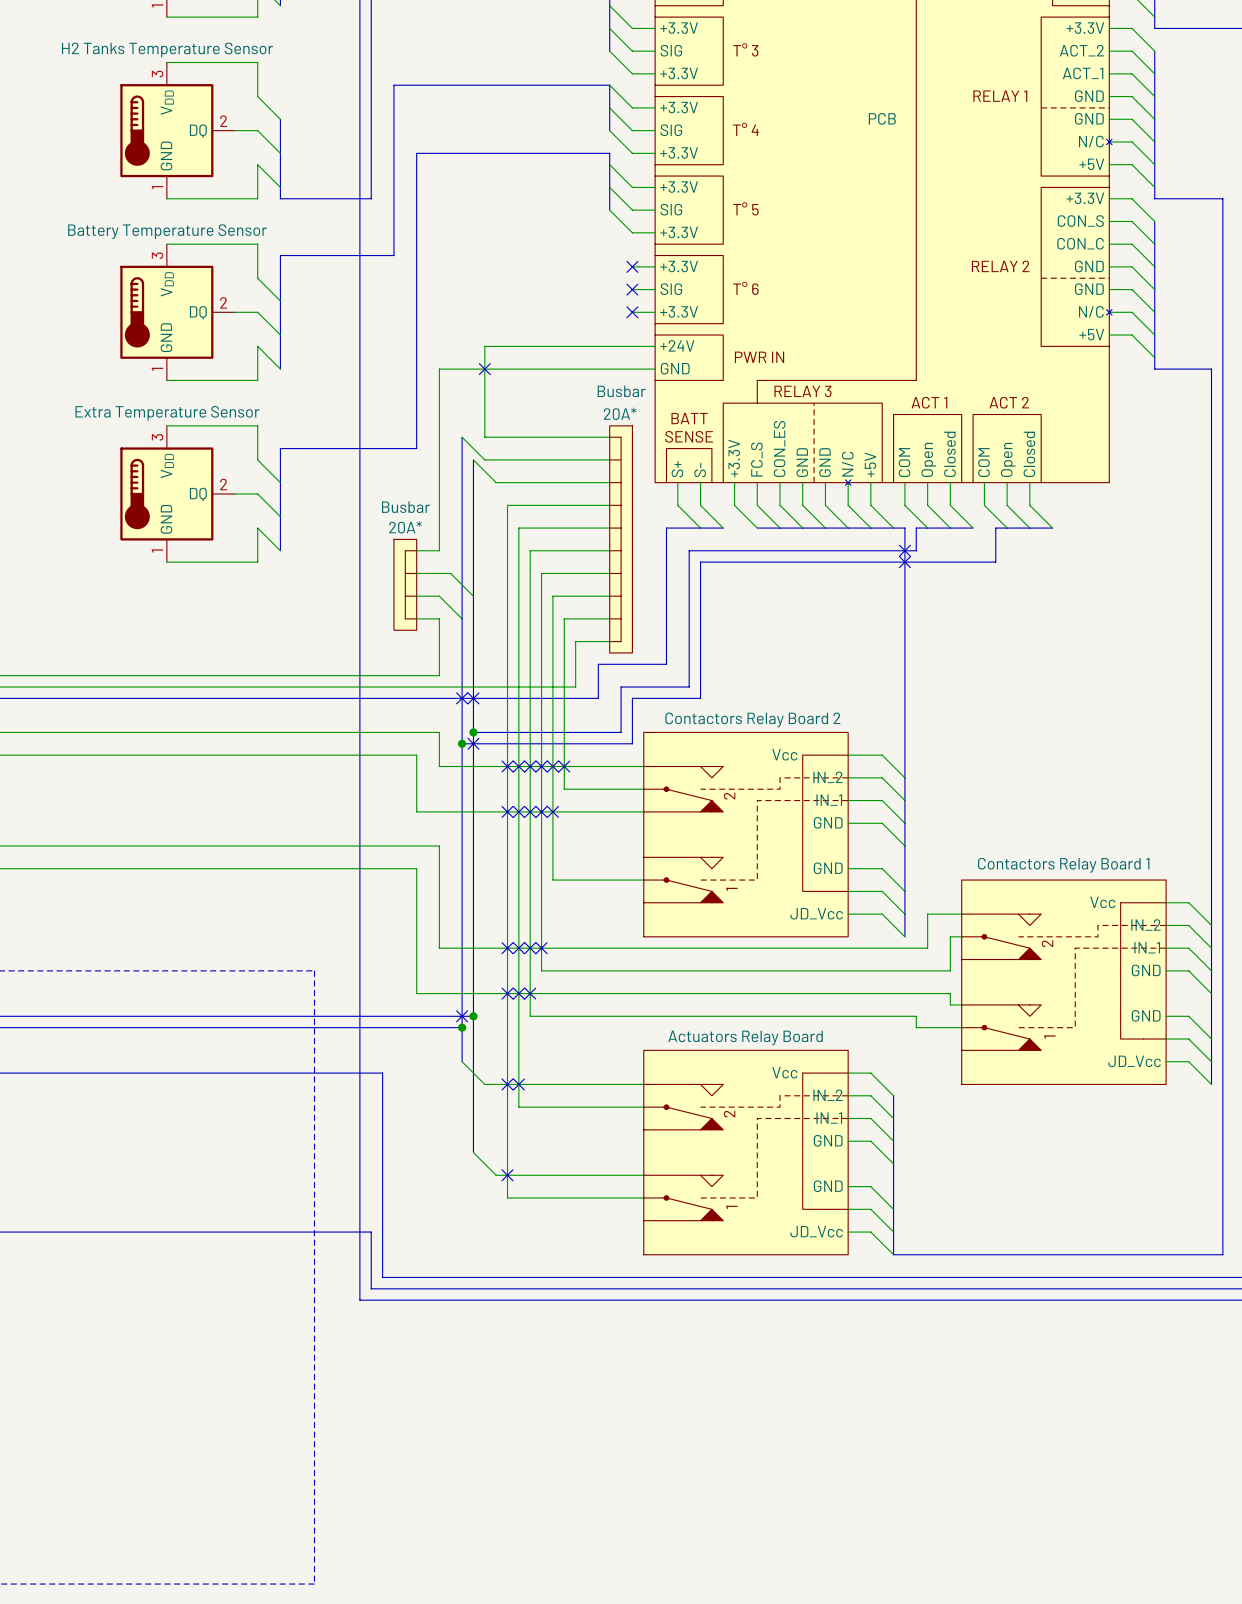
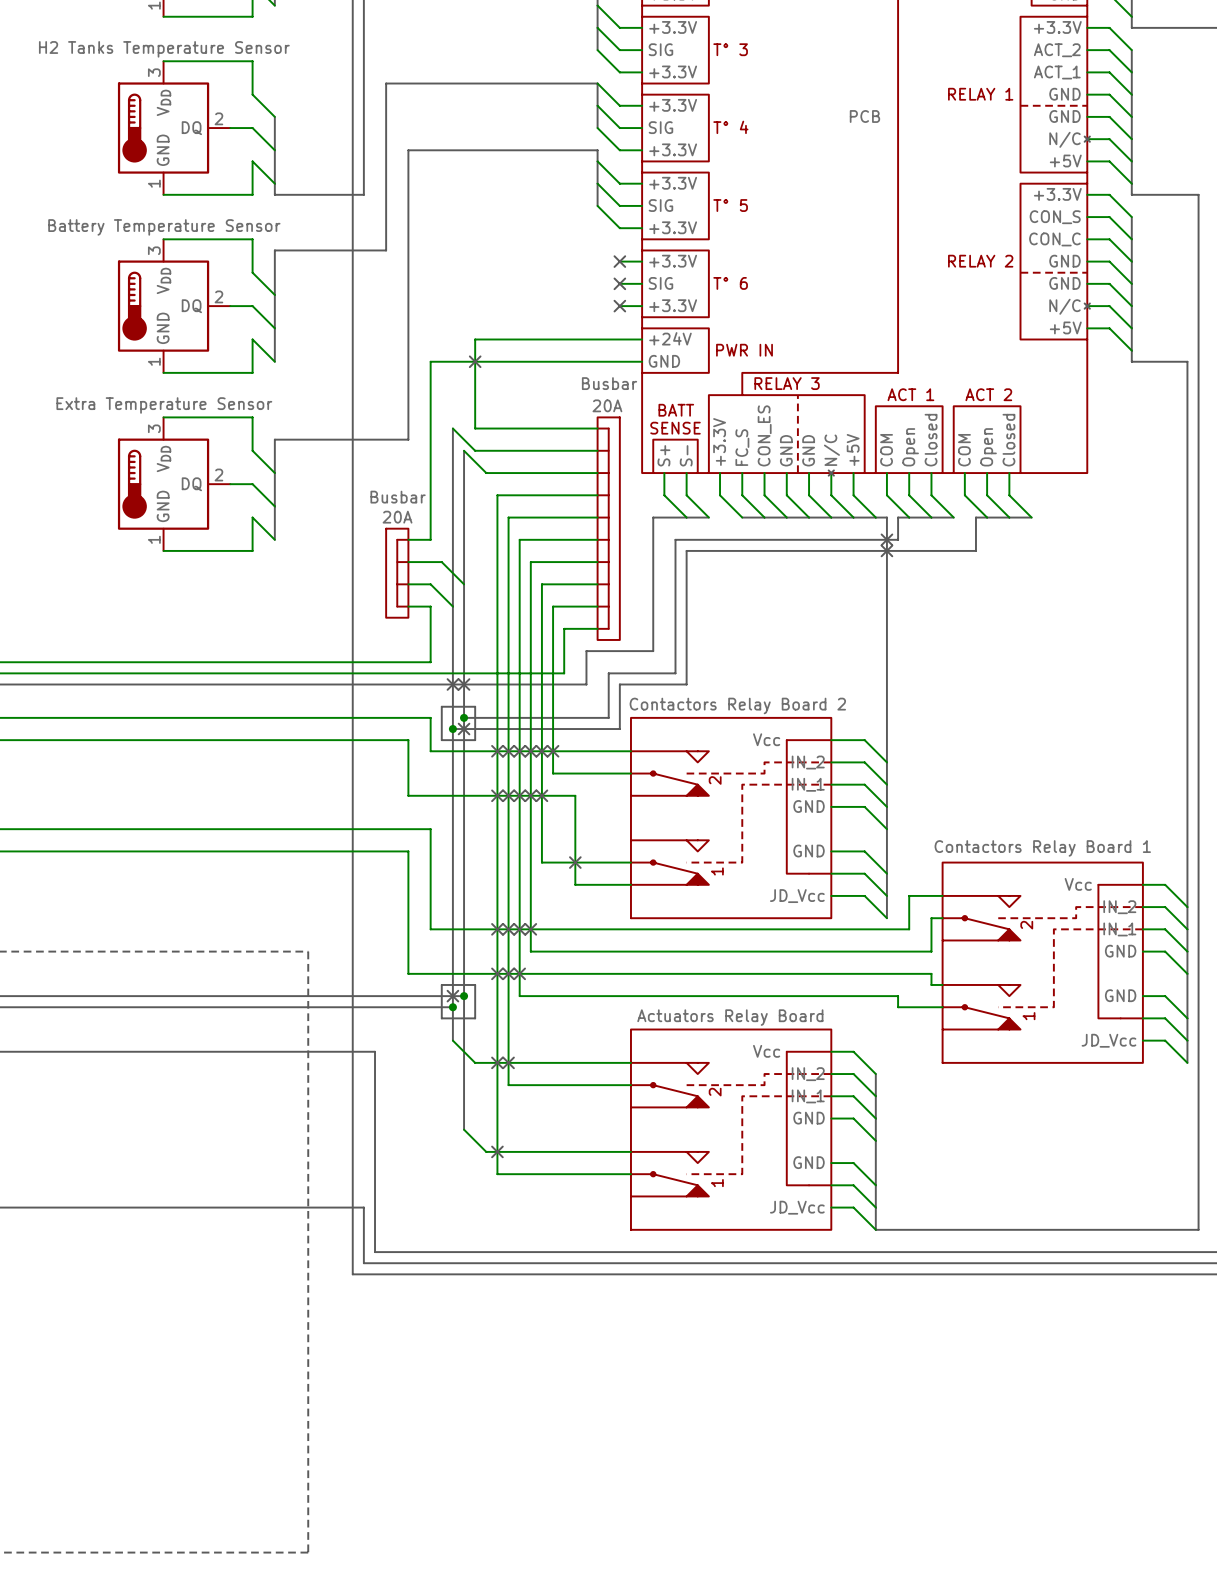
part value: 20A* (620, 413) -> 20A (607, 405)
part value: 20A* (405, 527) -> 20A (397, 517)
line: none -> (441, 706) (441, 740) (475, 740) (475, 706) (441, 706)
wire: (586, 811) (643, 811) -> (575, 795) (575, 884) (630, 884)
no-connect mark: none -> (575, 862)
line: none -> (441, 984) (475, 984) (475, 1018) (441, 1018) (441, 984)

